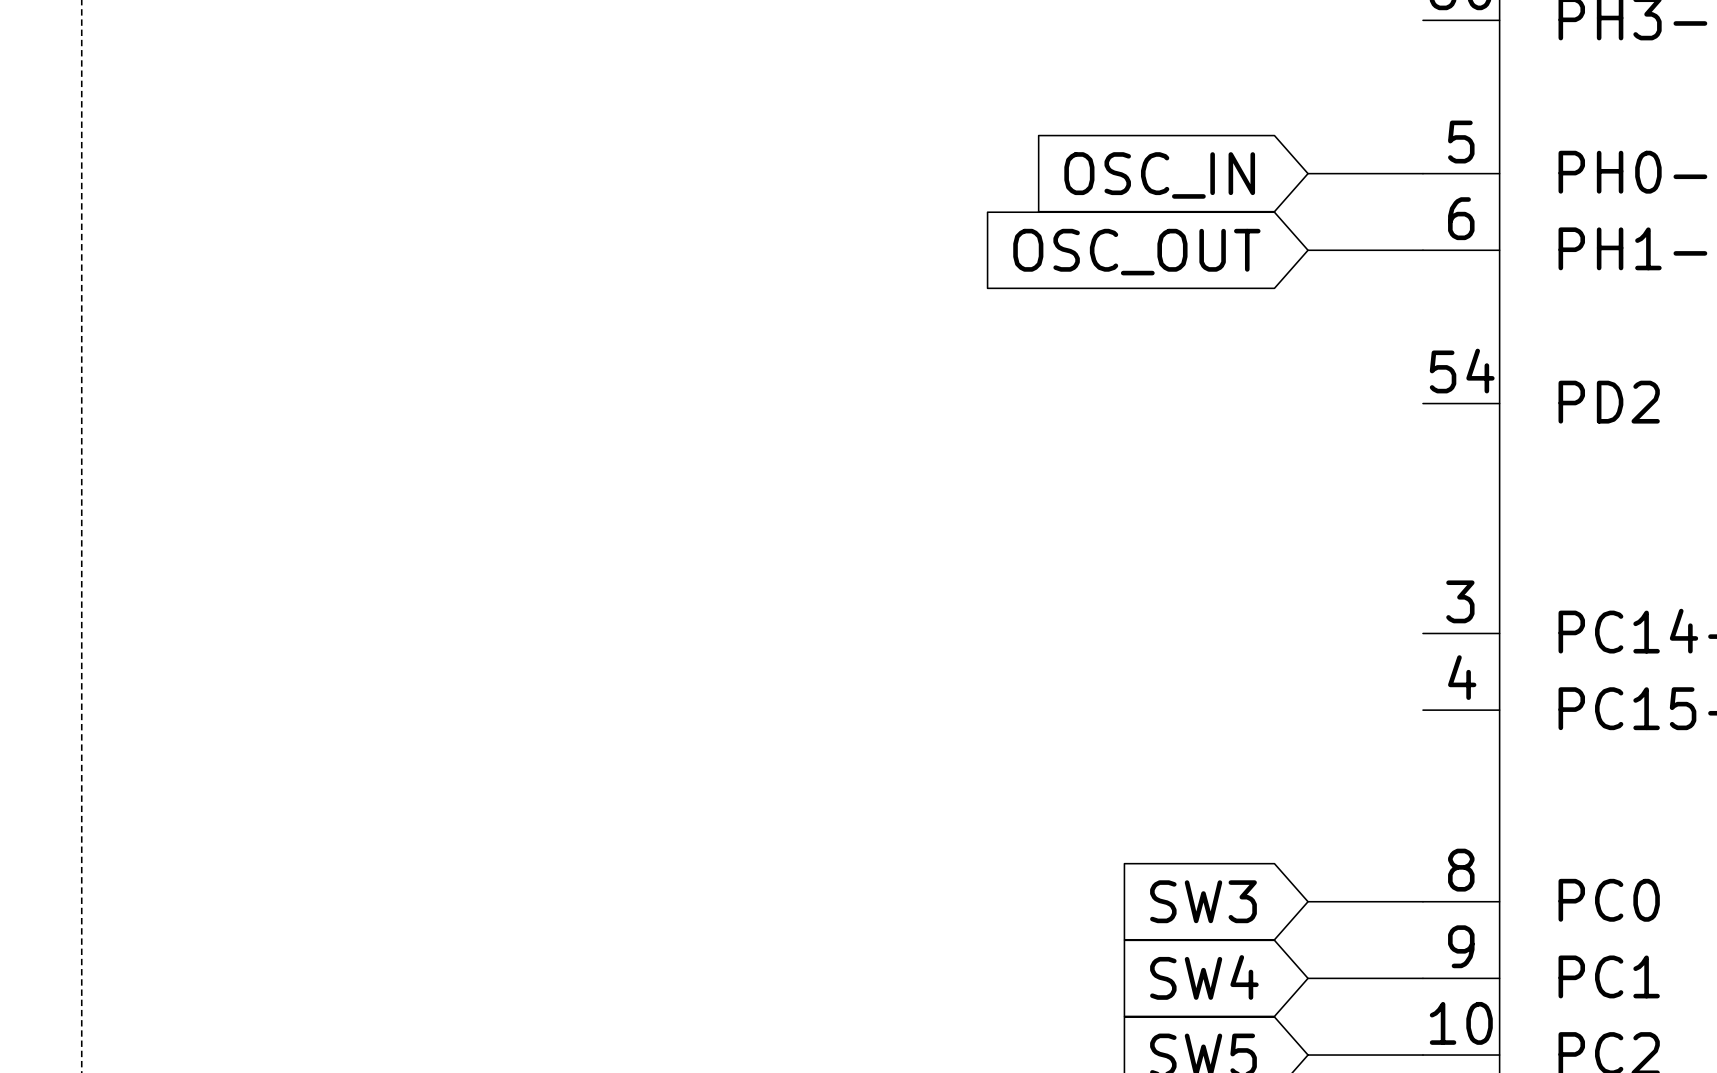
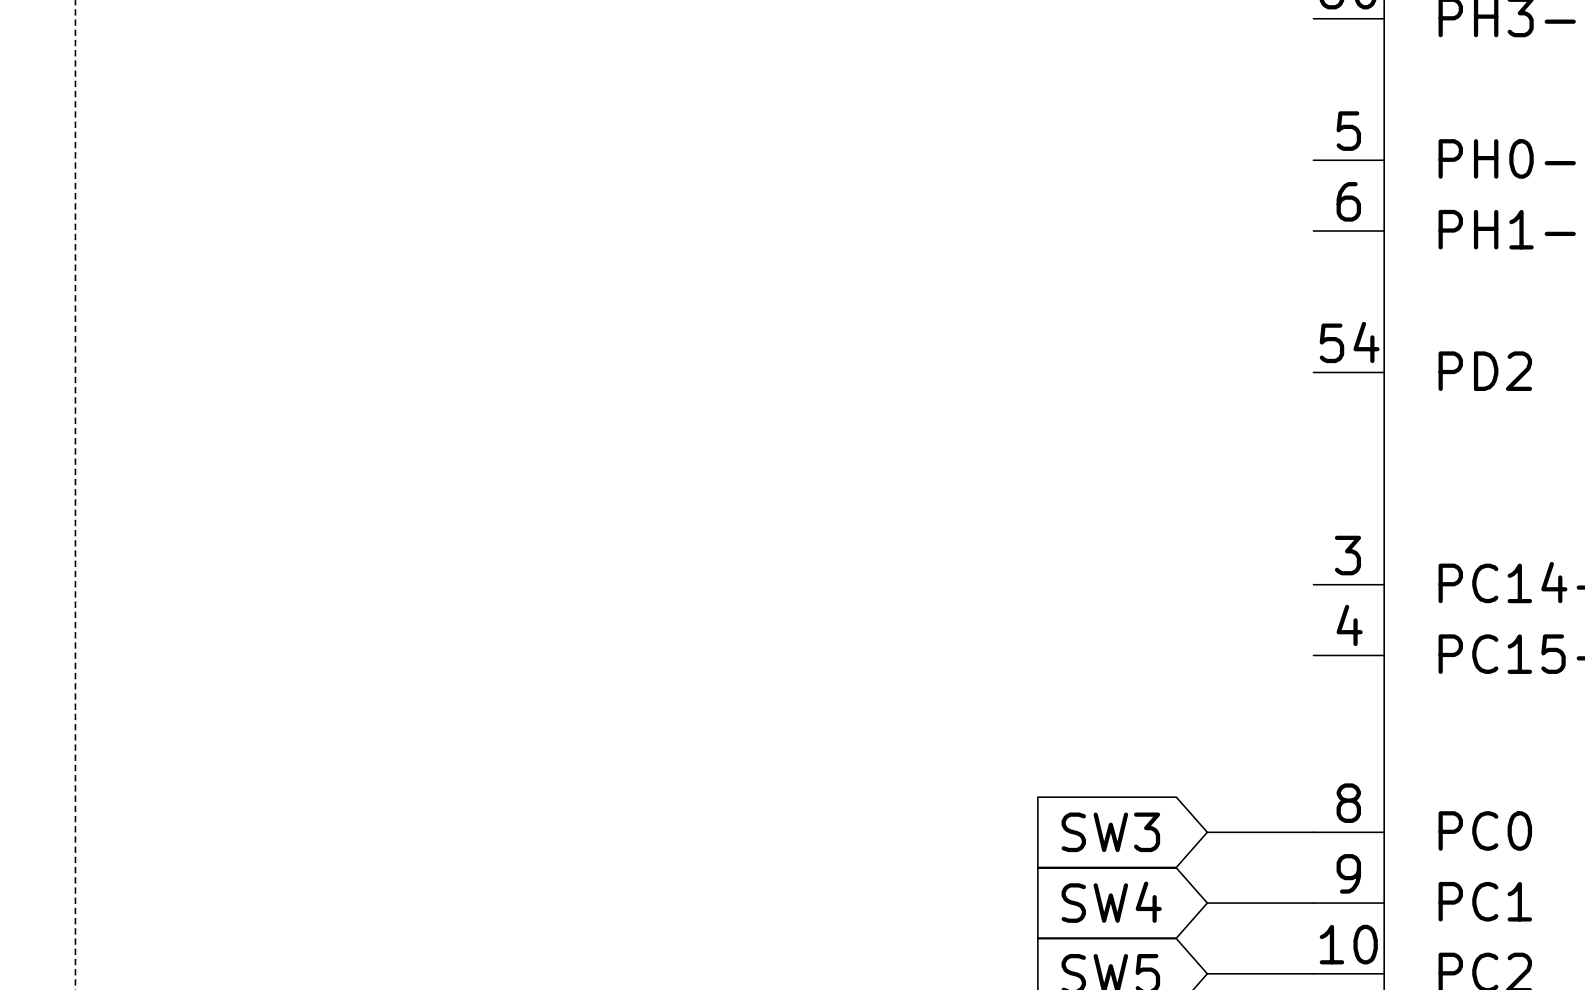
wire: (1308, 173) (1422, 173) -> none
global label: OSC_IN (1159, 175) -> none
wire: (1308, 250) (1422, 250) -> none
global label: OSC_OUT (1136, 252) -> none

